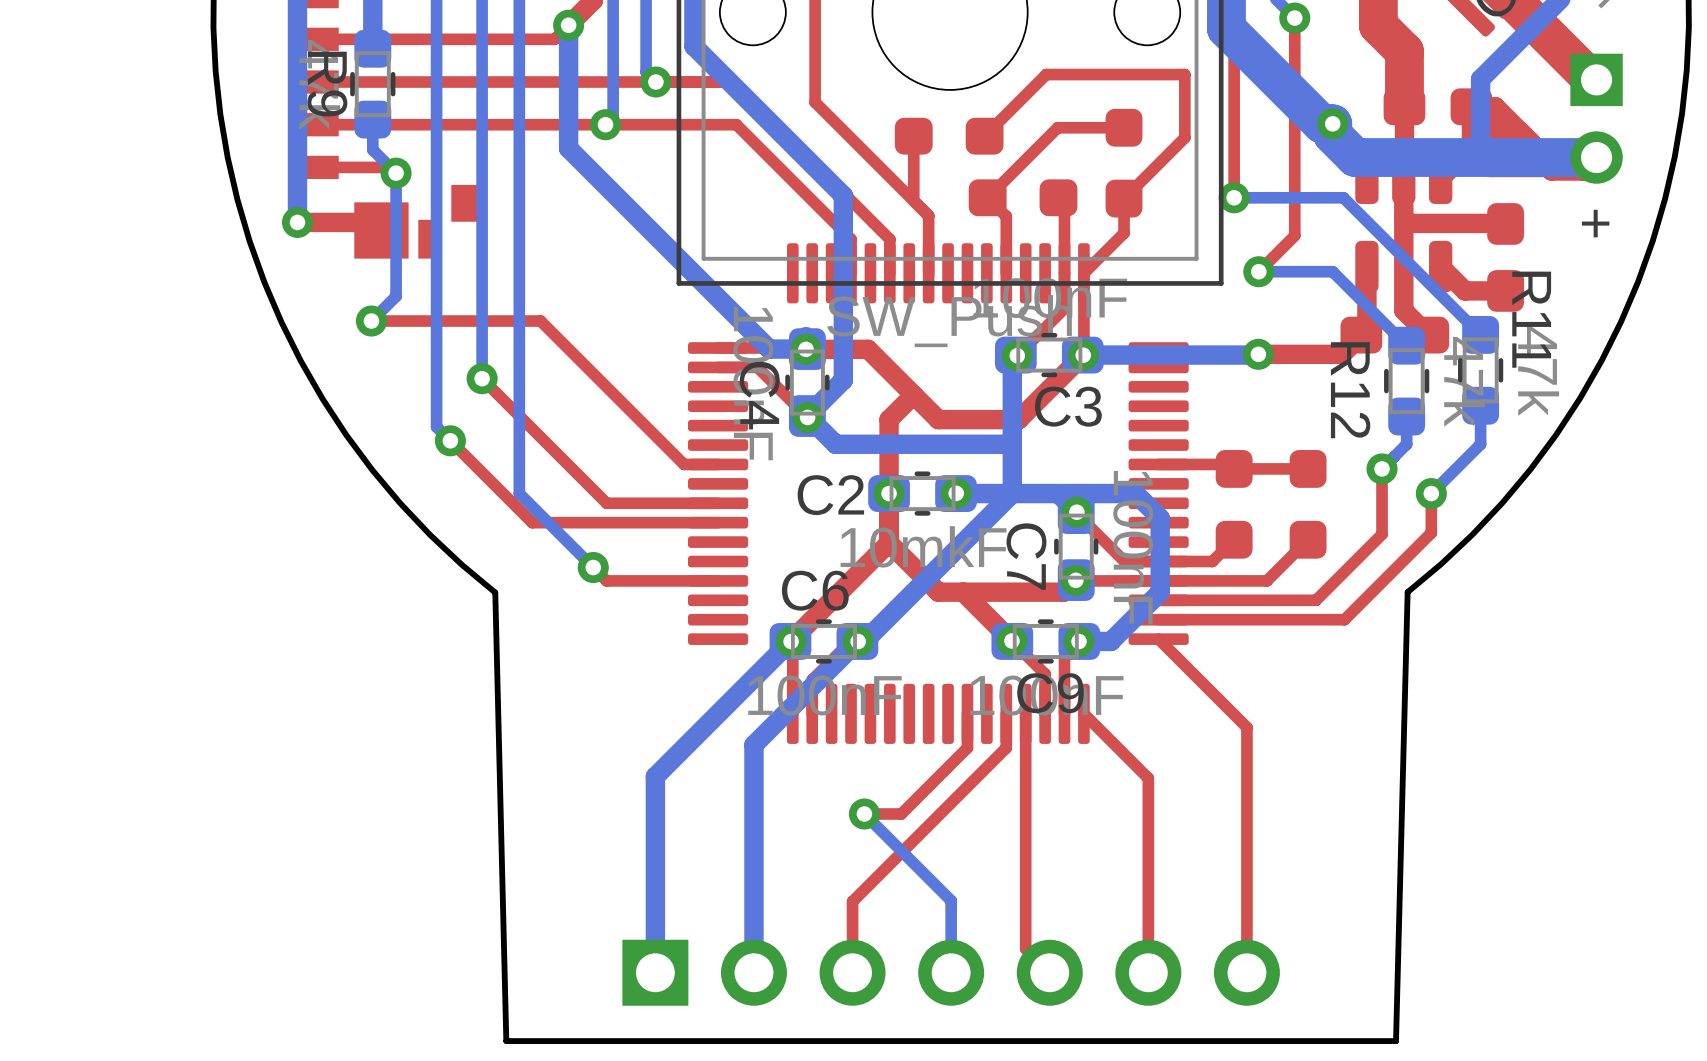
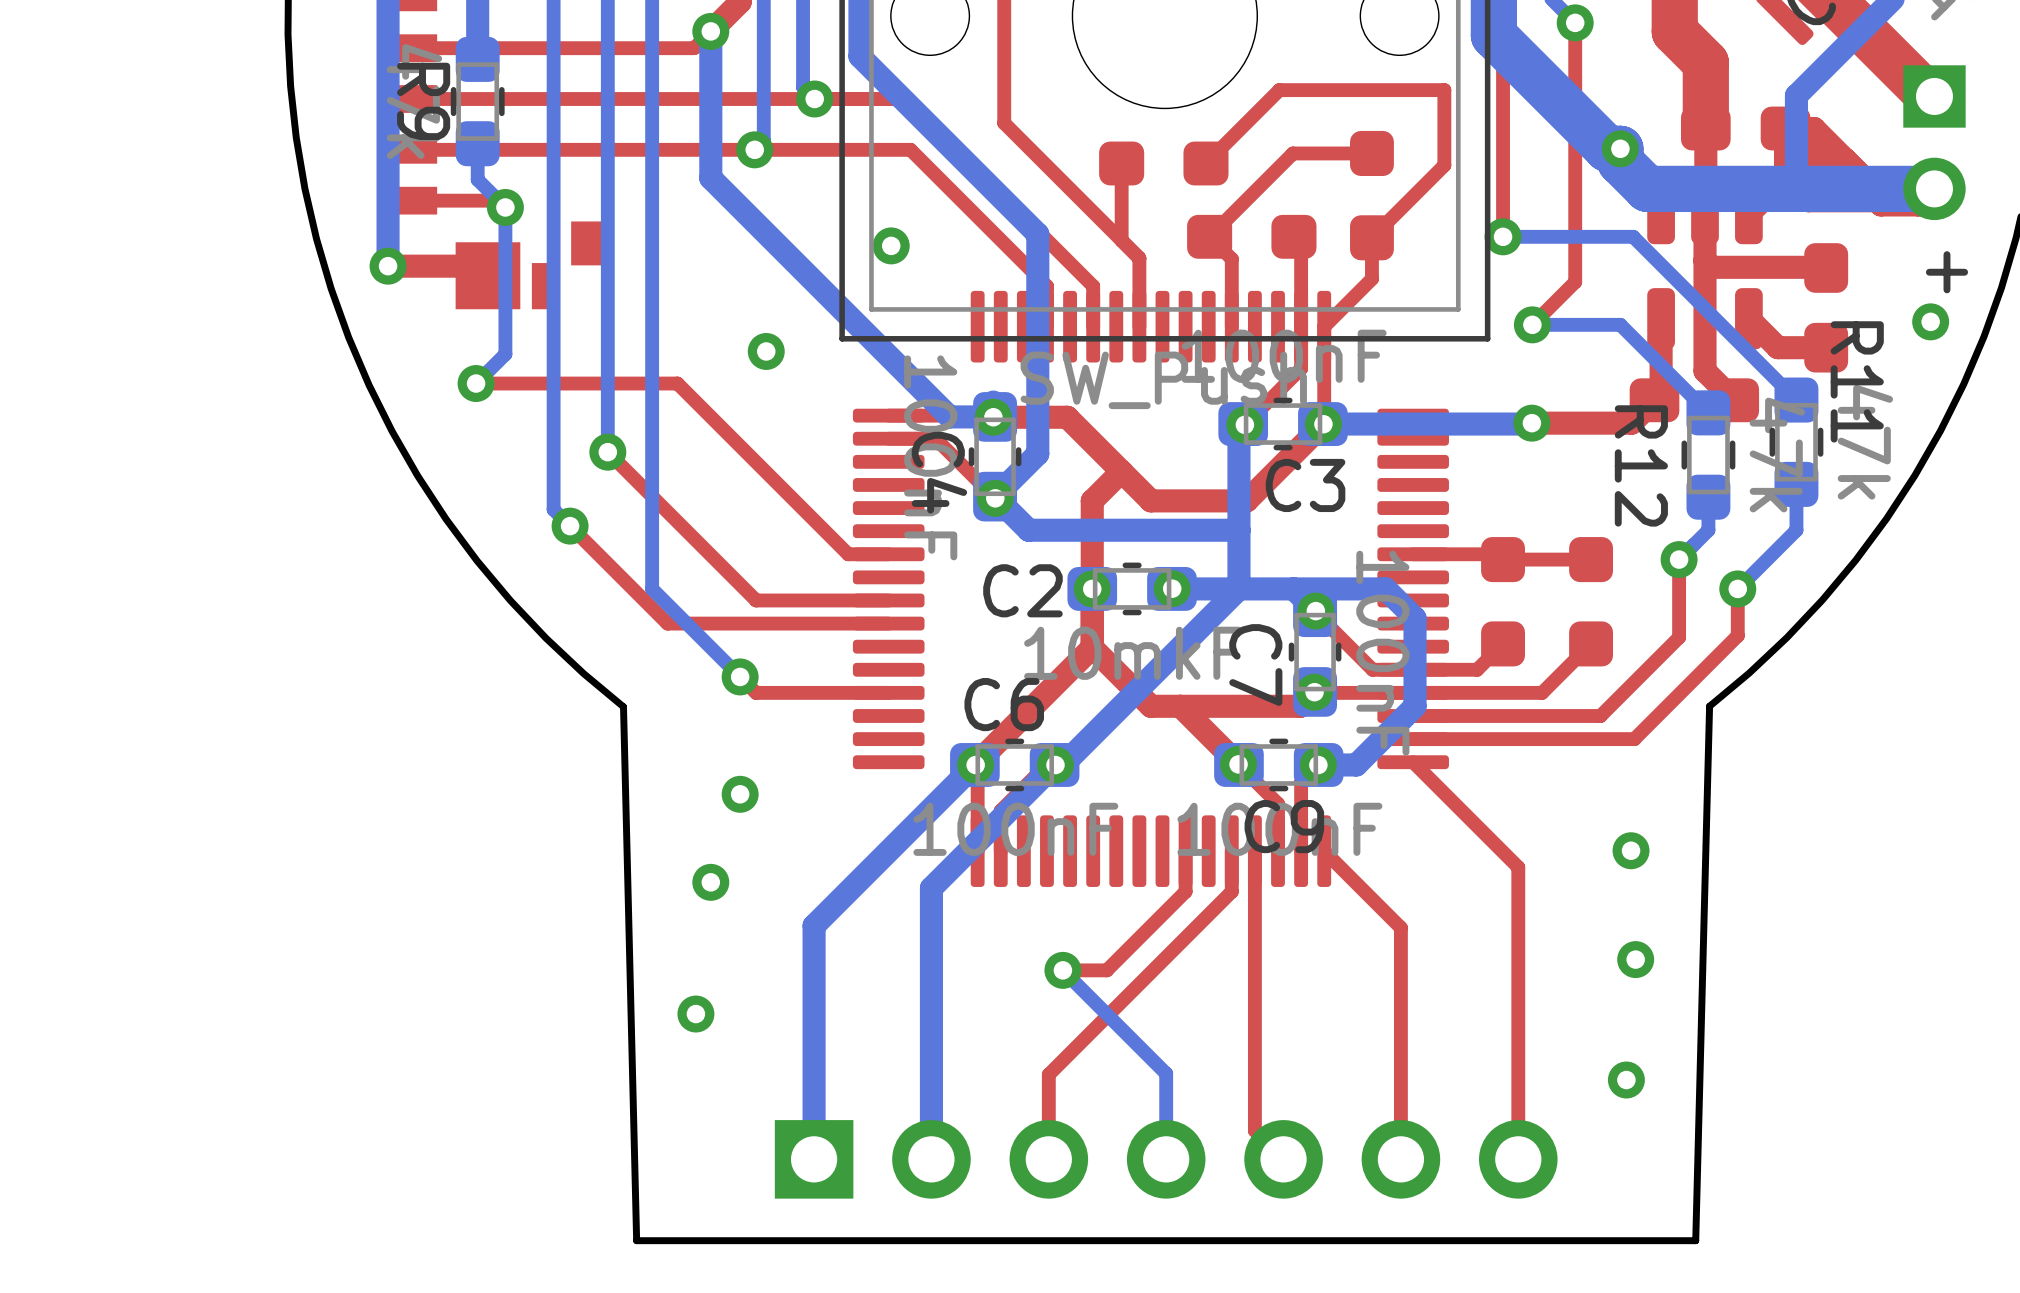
via: none -> (891, 245)
via: none -> (1930, 321)
via: none -> (766, 351)
via: none -> (740, 794)
via: none -> (1631, 850)
via: none -> (710, 882)
via: none -> (1635, 959)
via: none -> (695, 1014)
via: none -> (1626, 1080)

